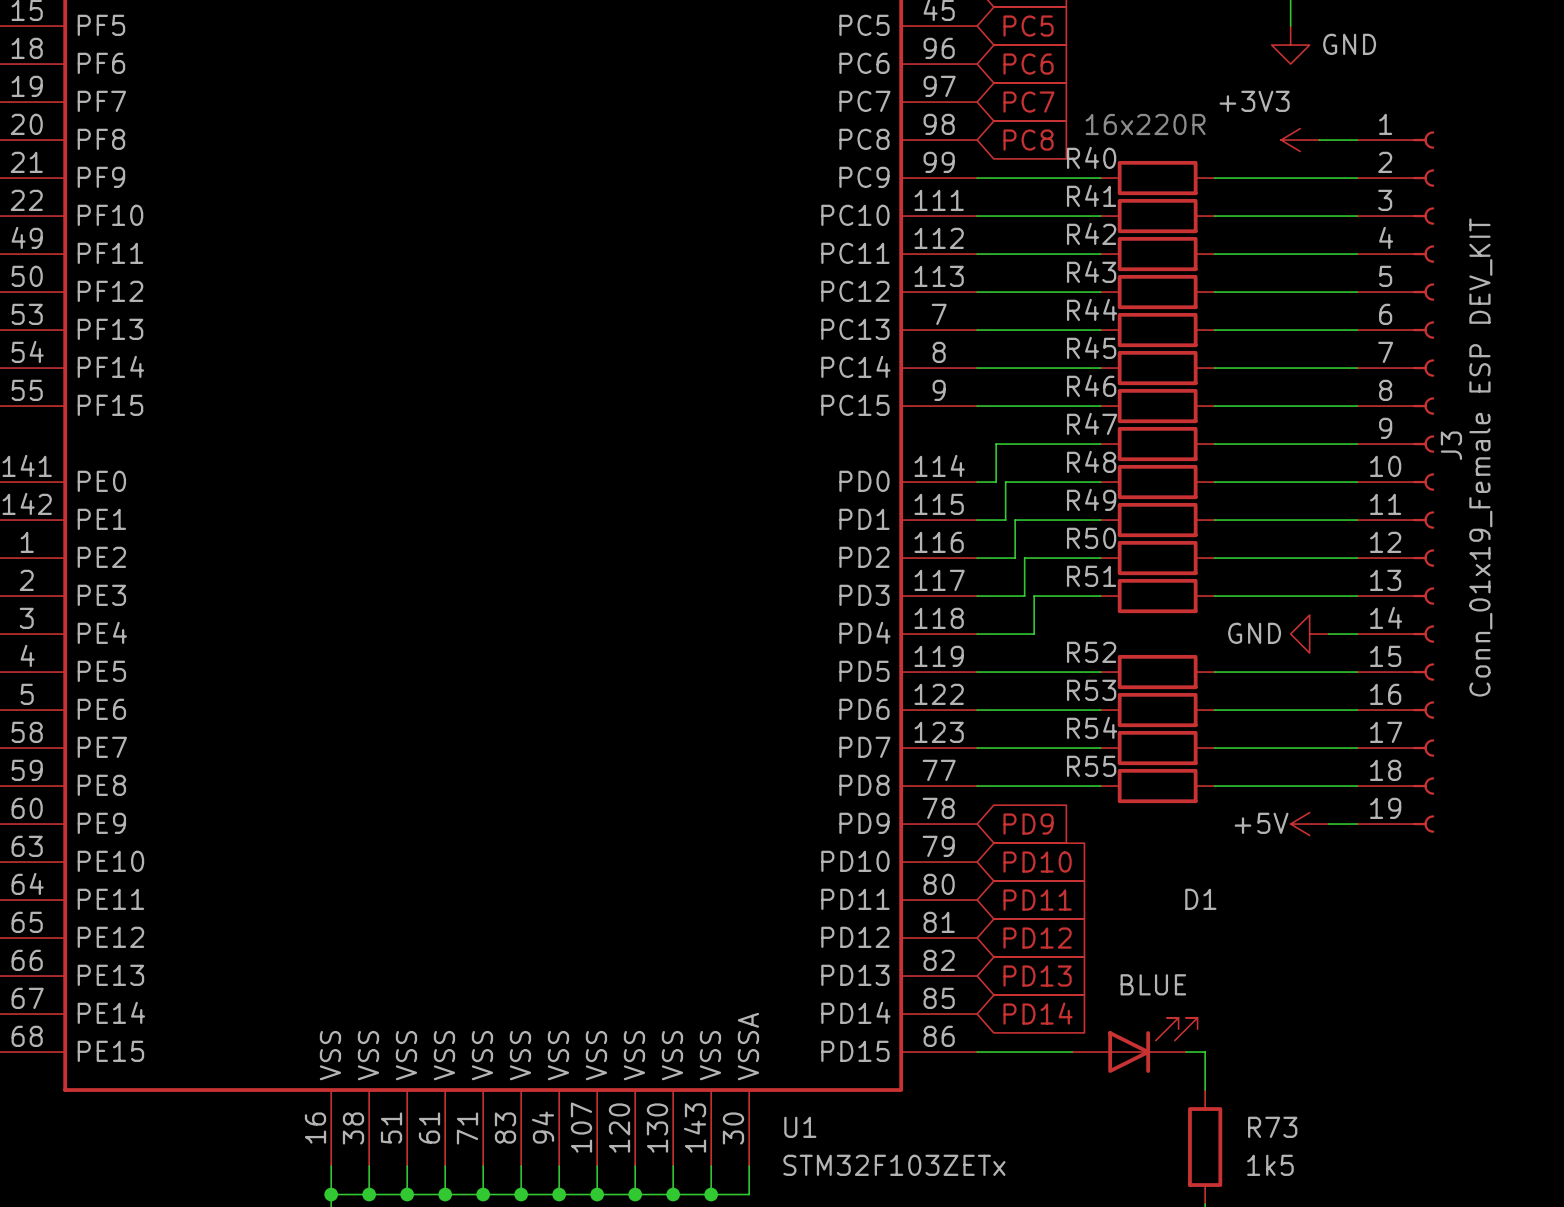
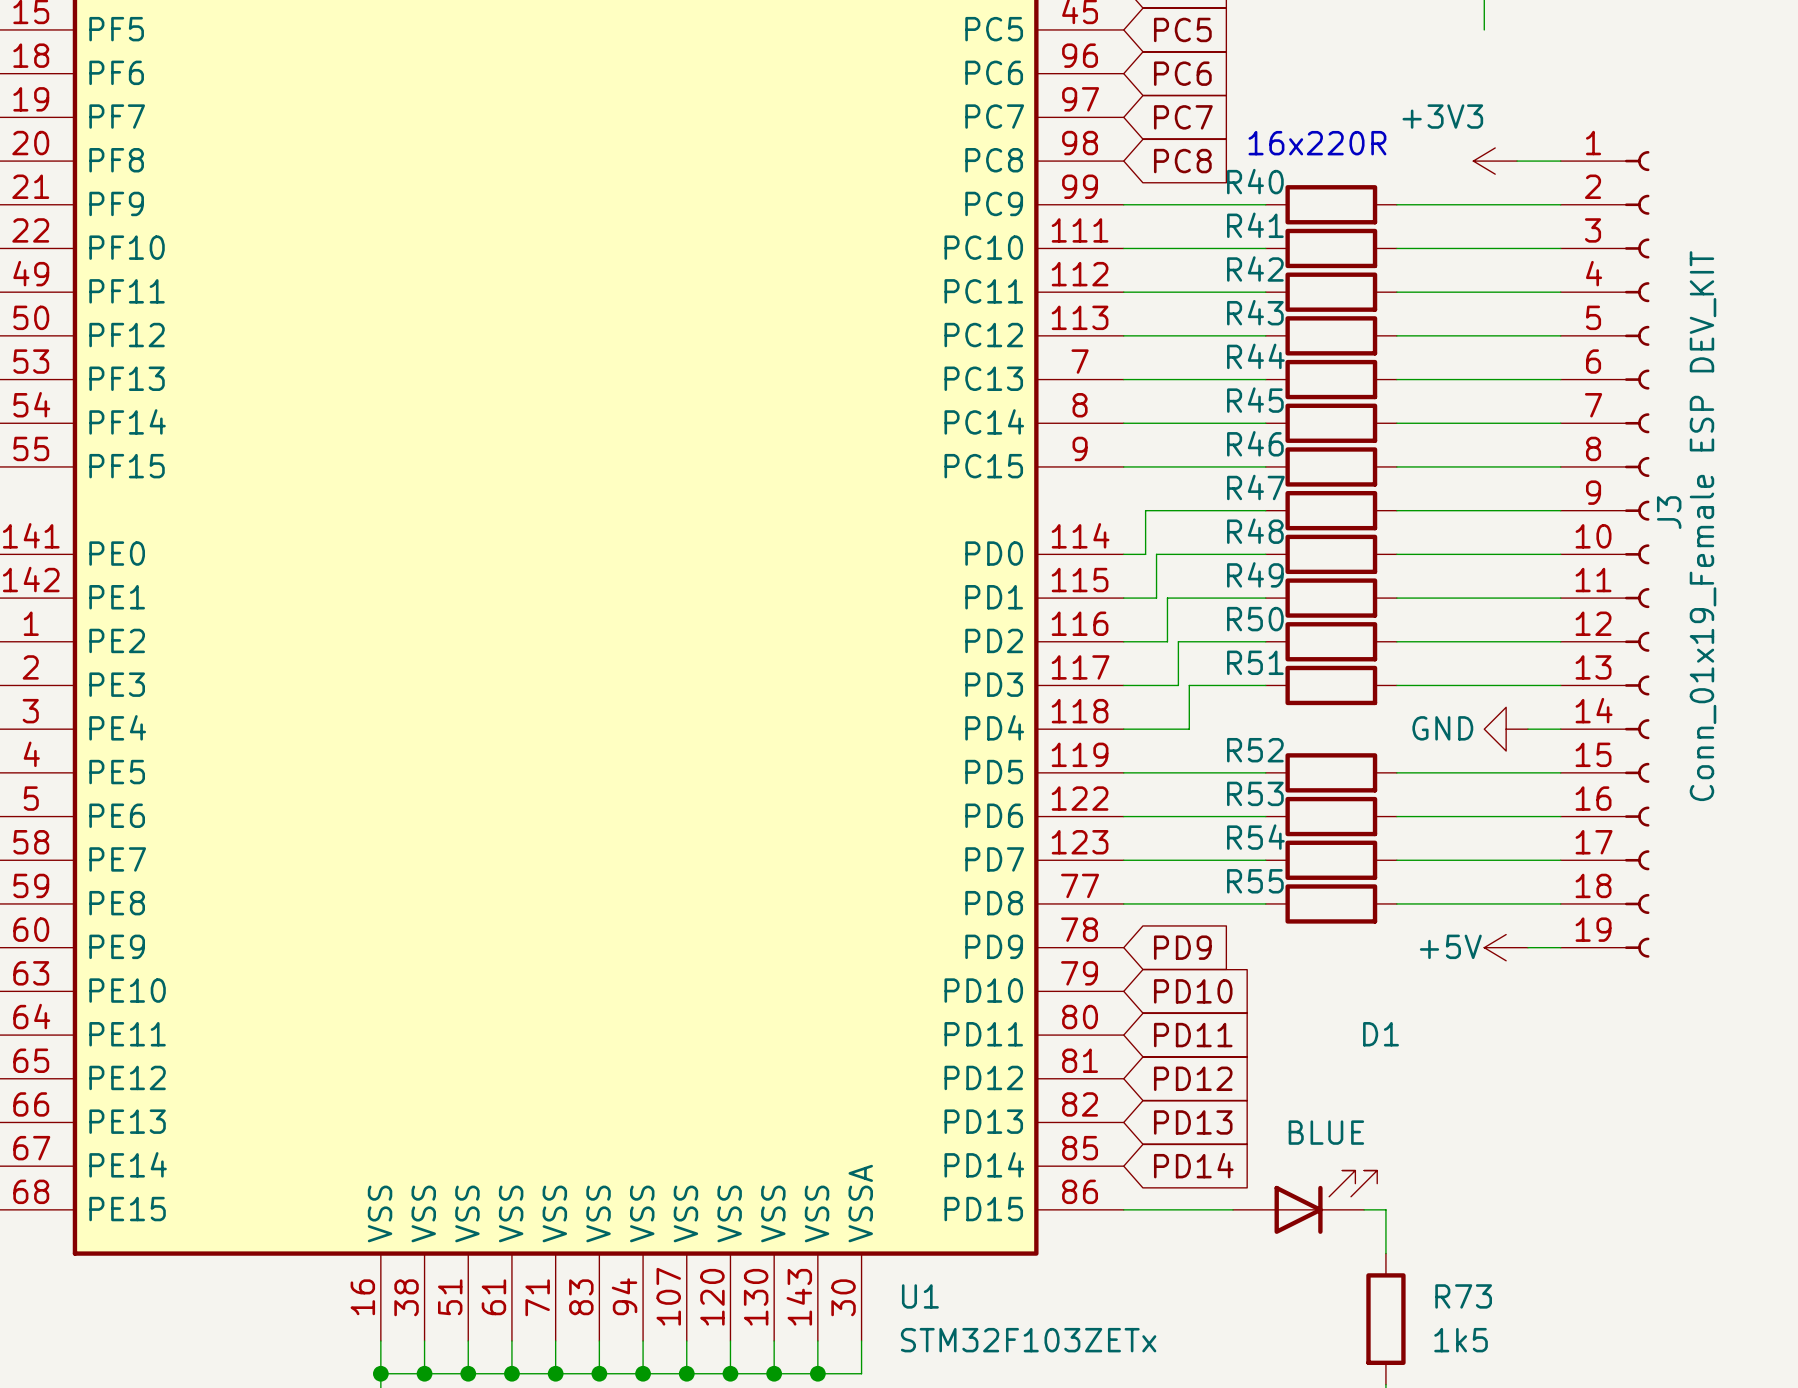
power symbol: GND (1290, 45) -> none

